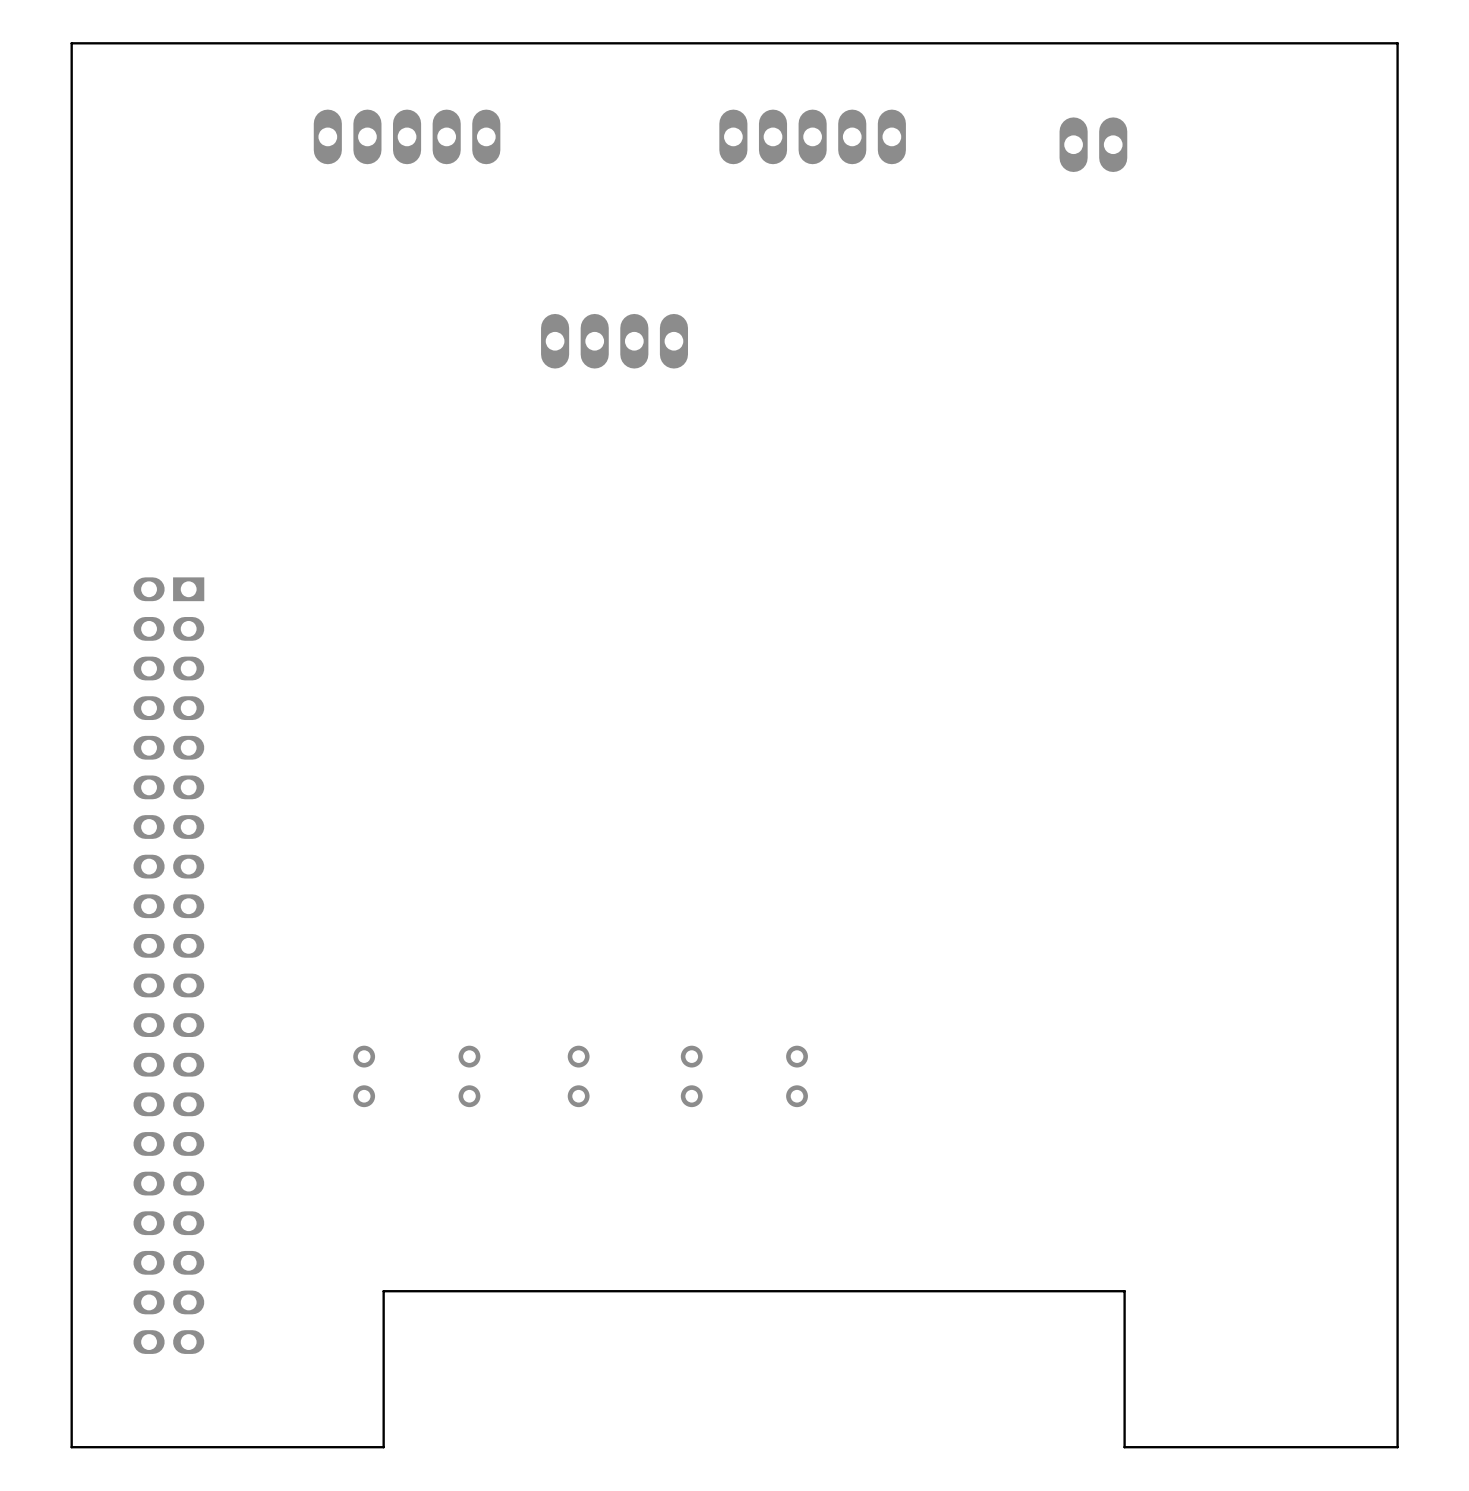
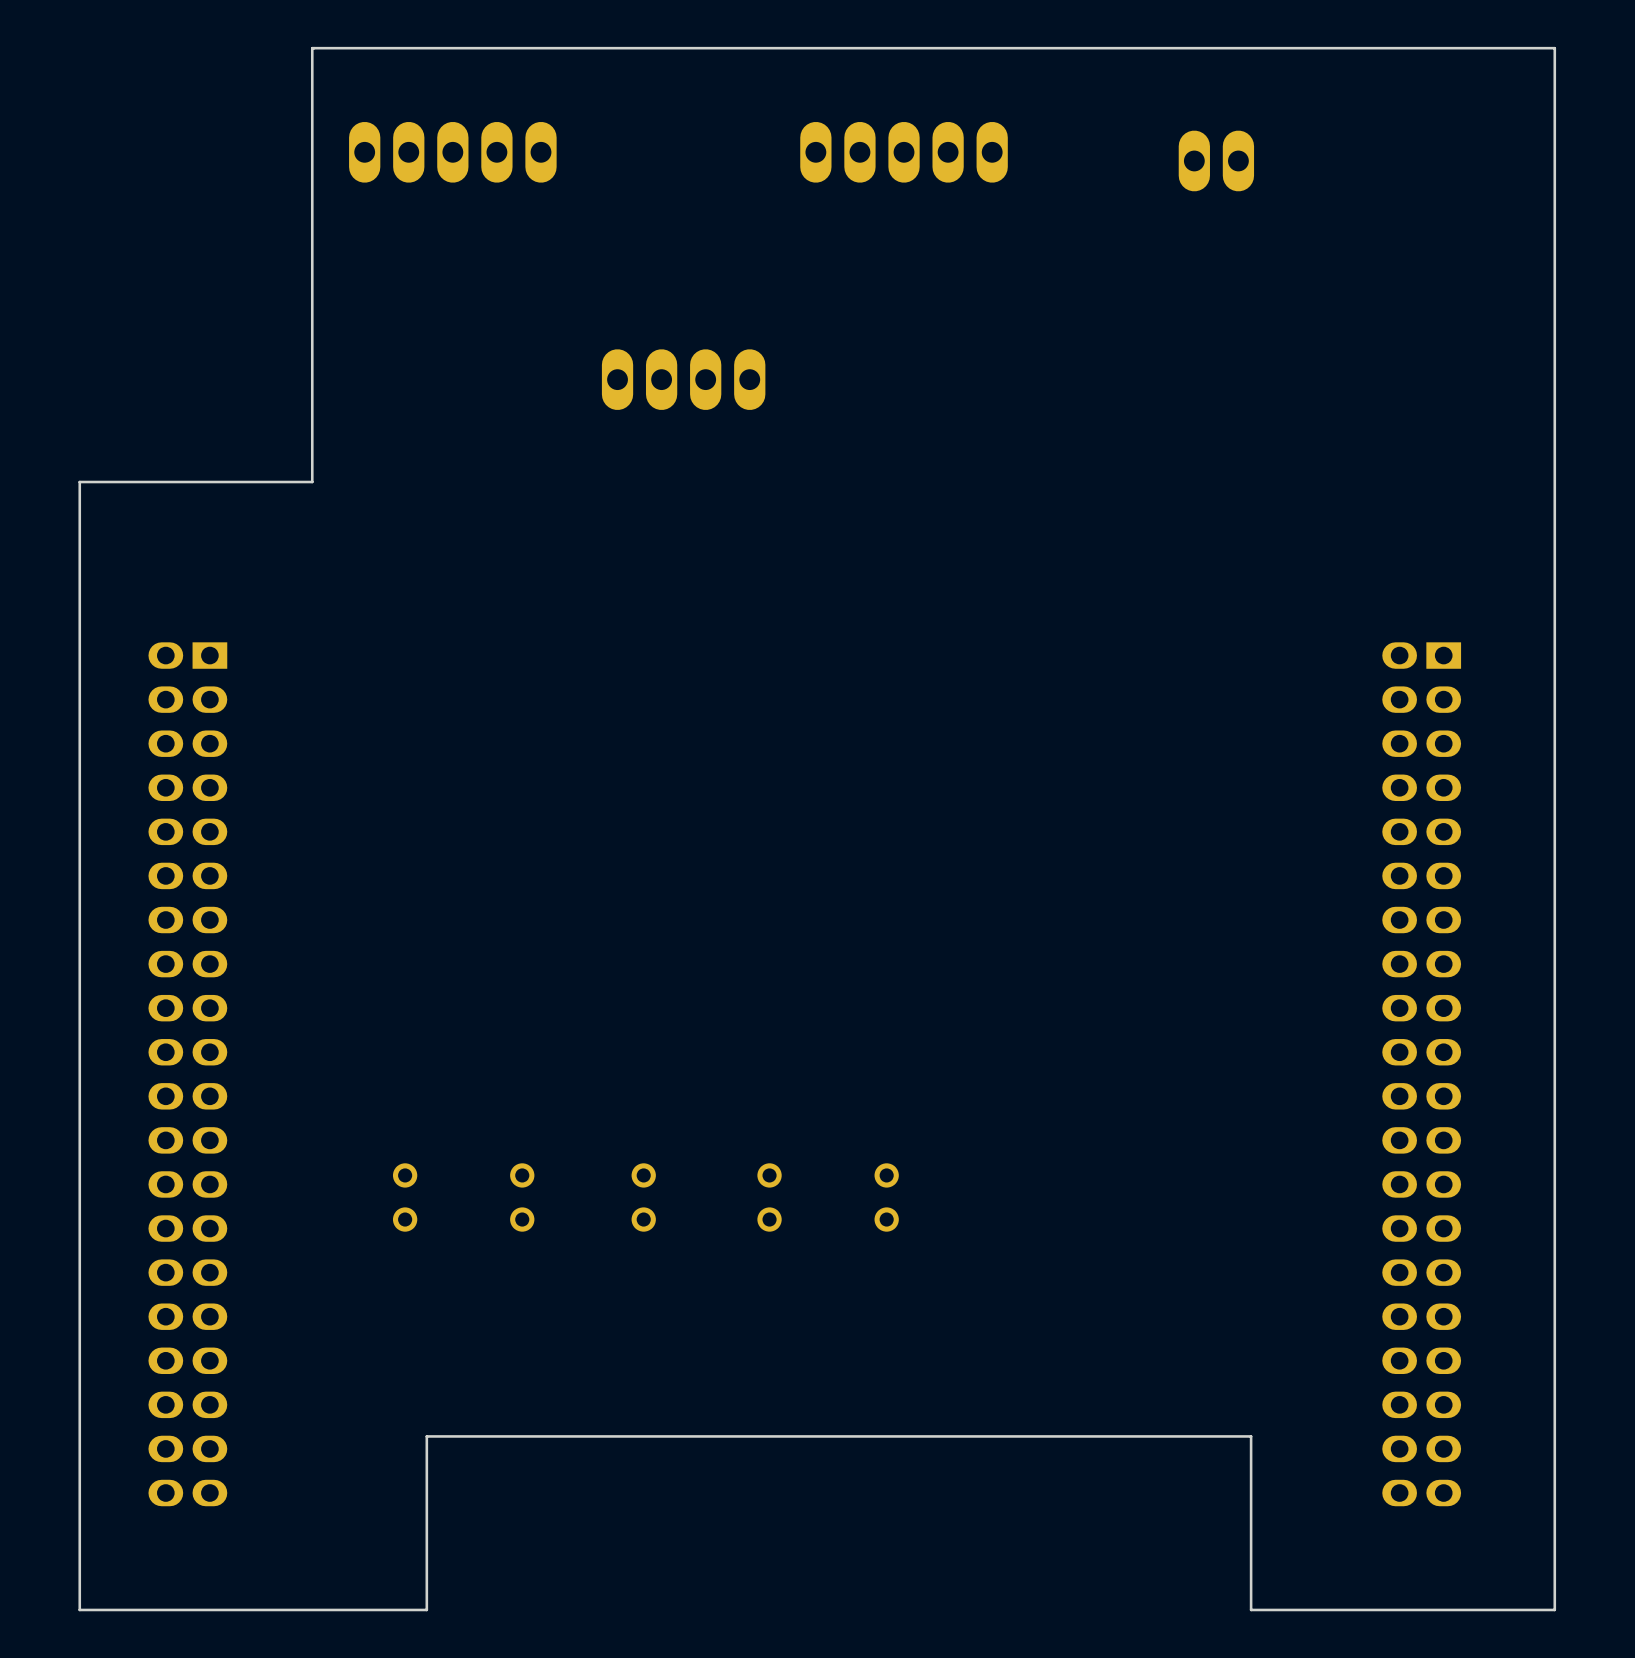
board edge: (280, 43) (71, 43) (71, 433) -> (312, 48) (312, 482) (79, 482)
part: none -> (1421, 1074)

